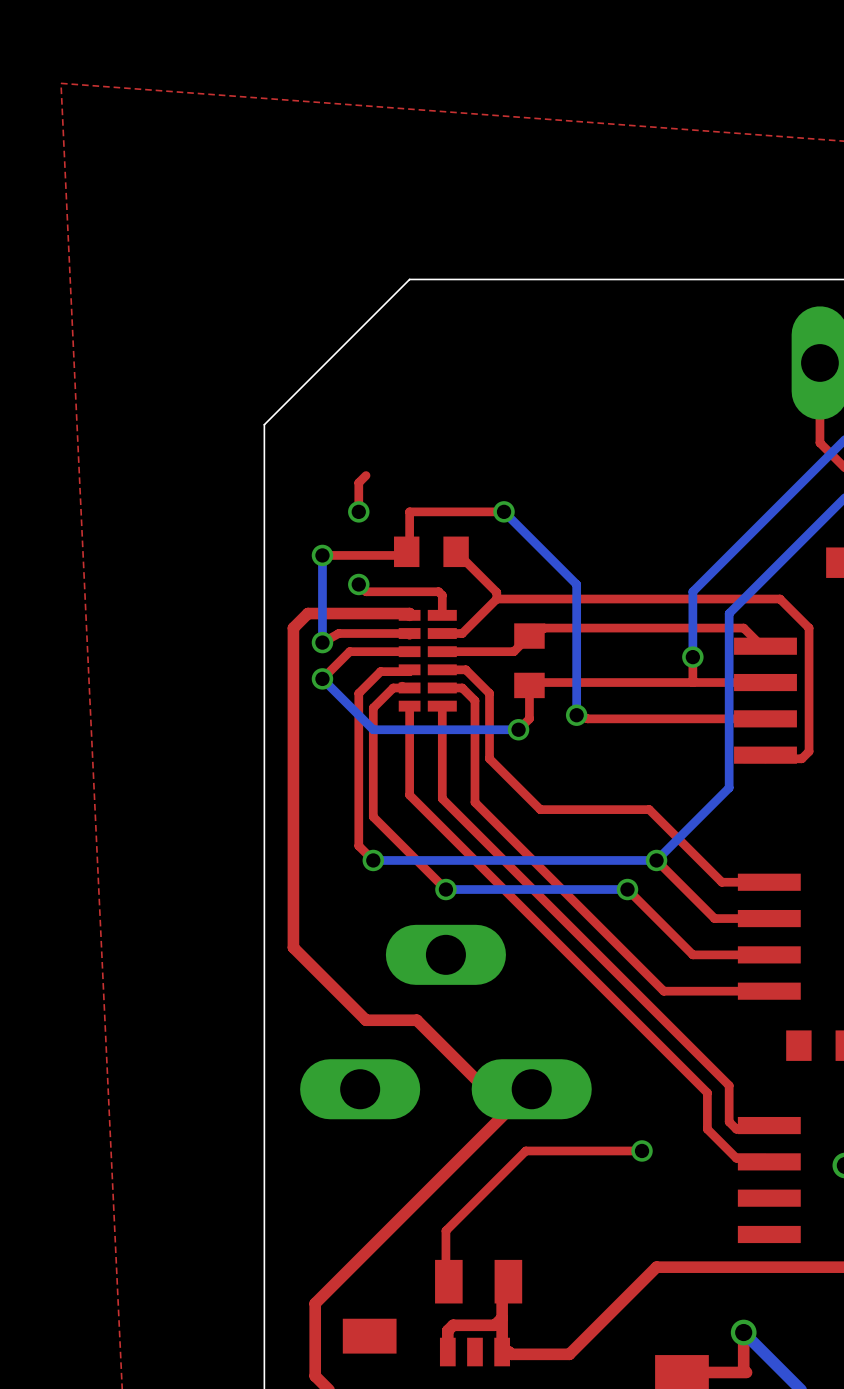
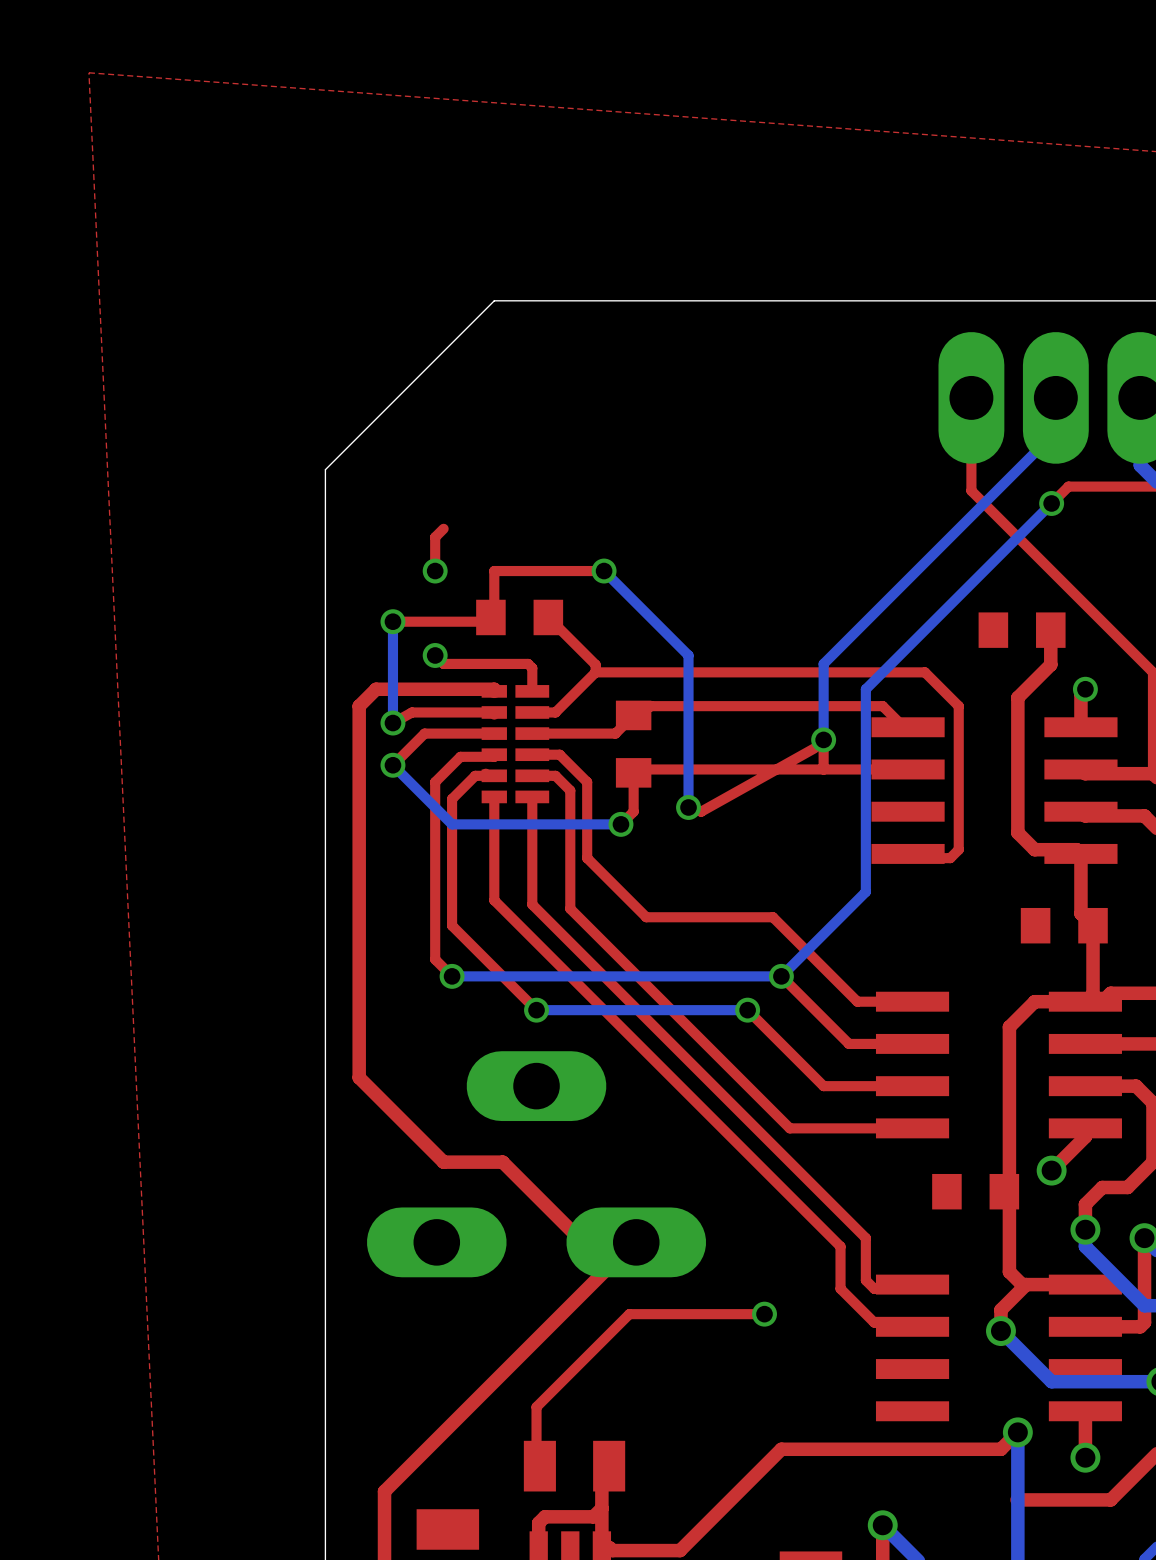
top track: (765, 718) (587, 718) -> (814, 748) (701, 811)

